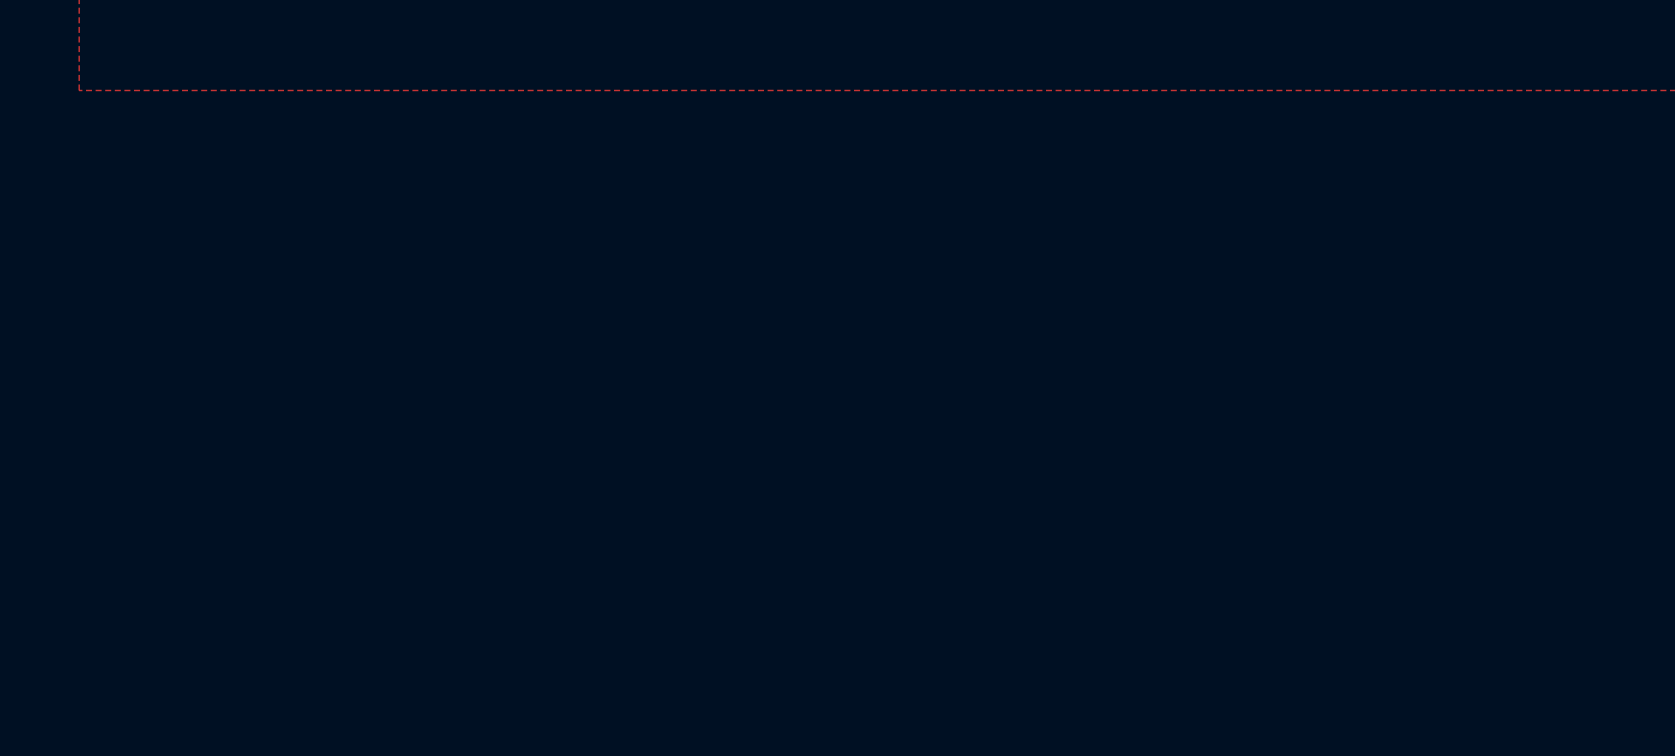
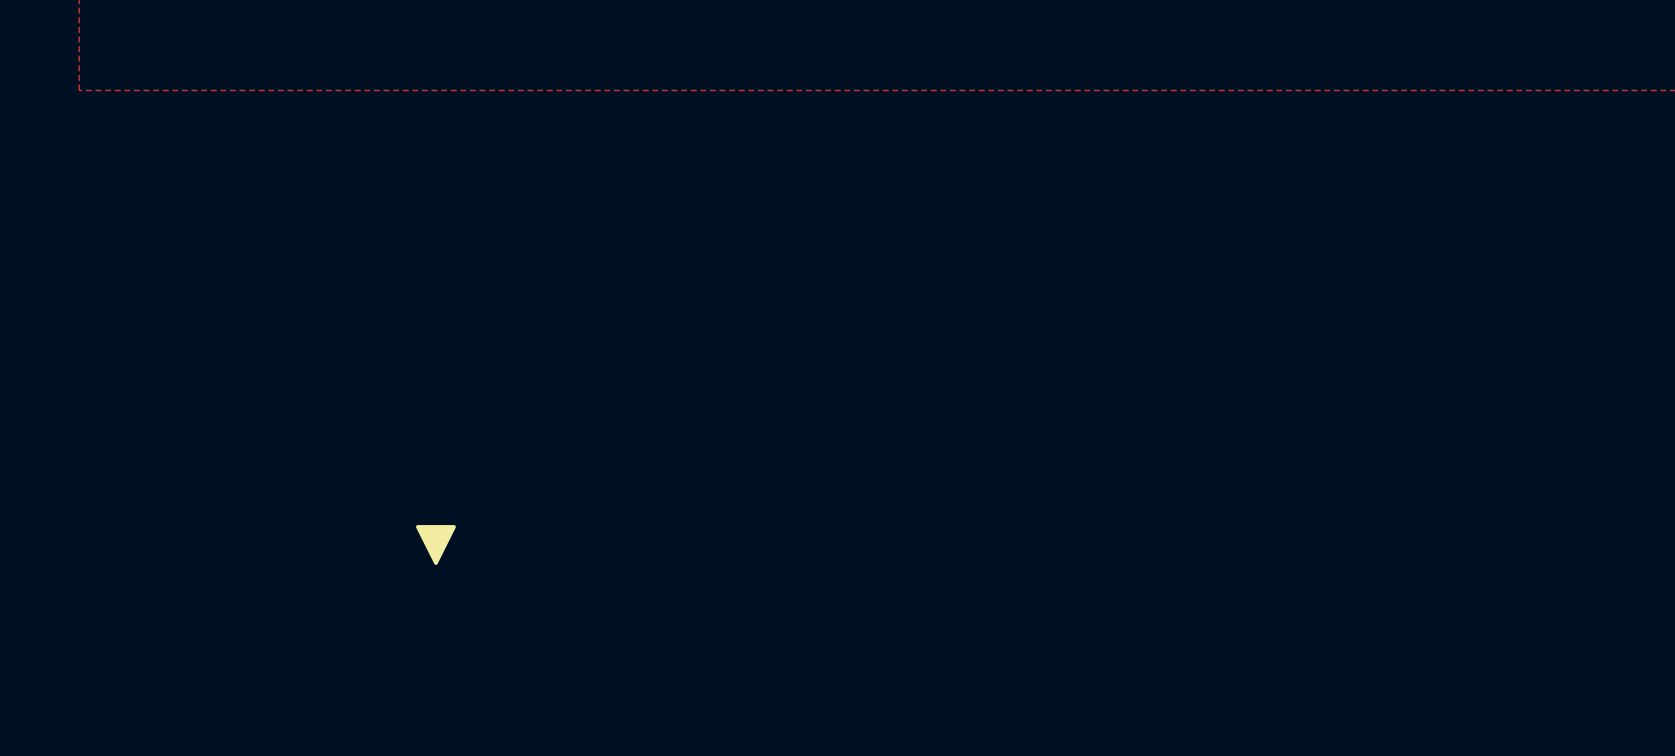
drawing: none -> [415, 525, 456, 565]

